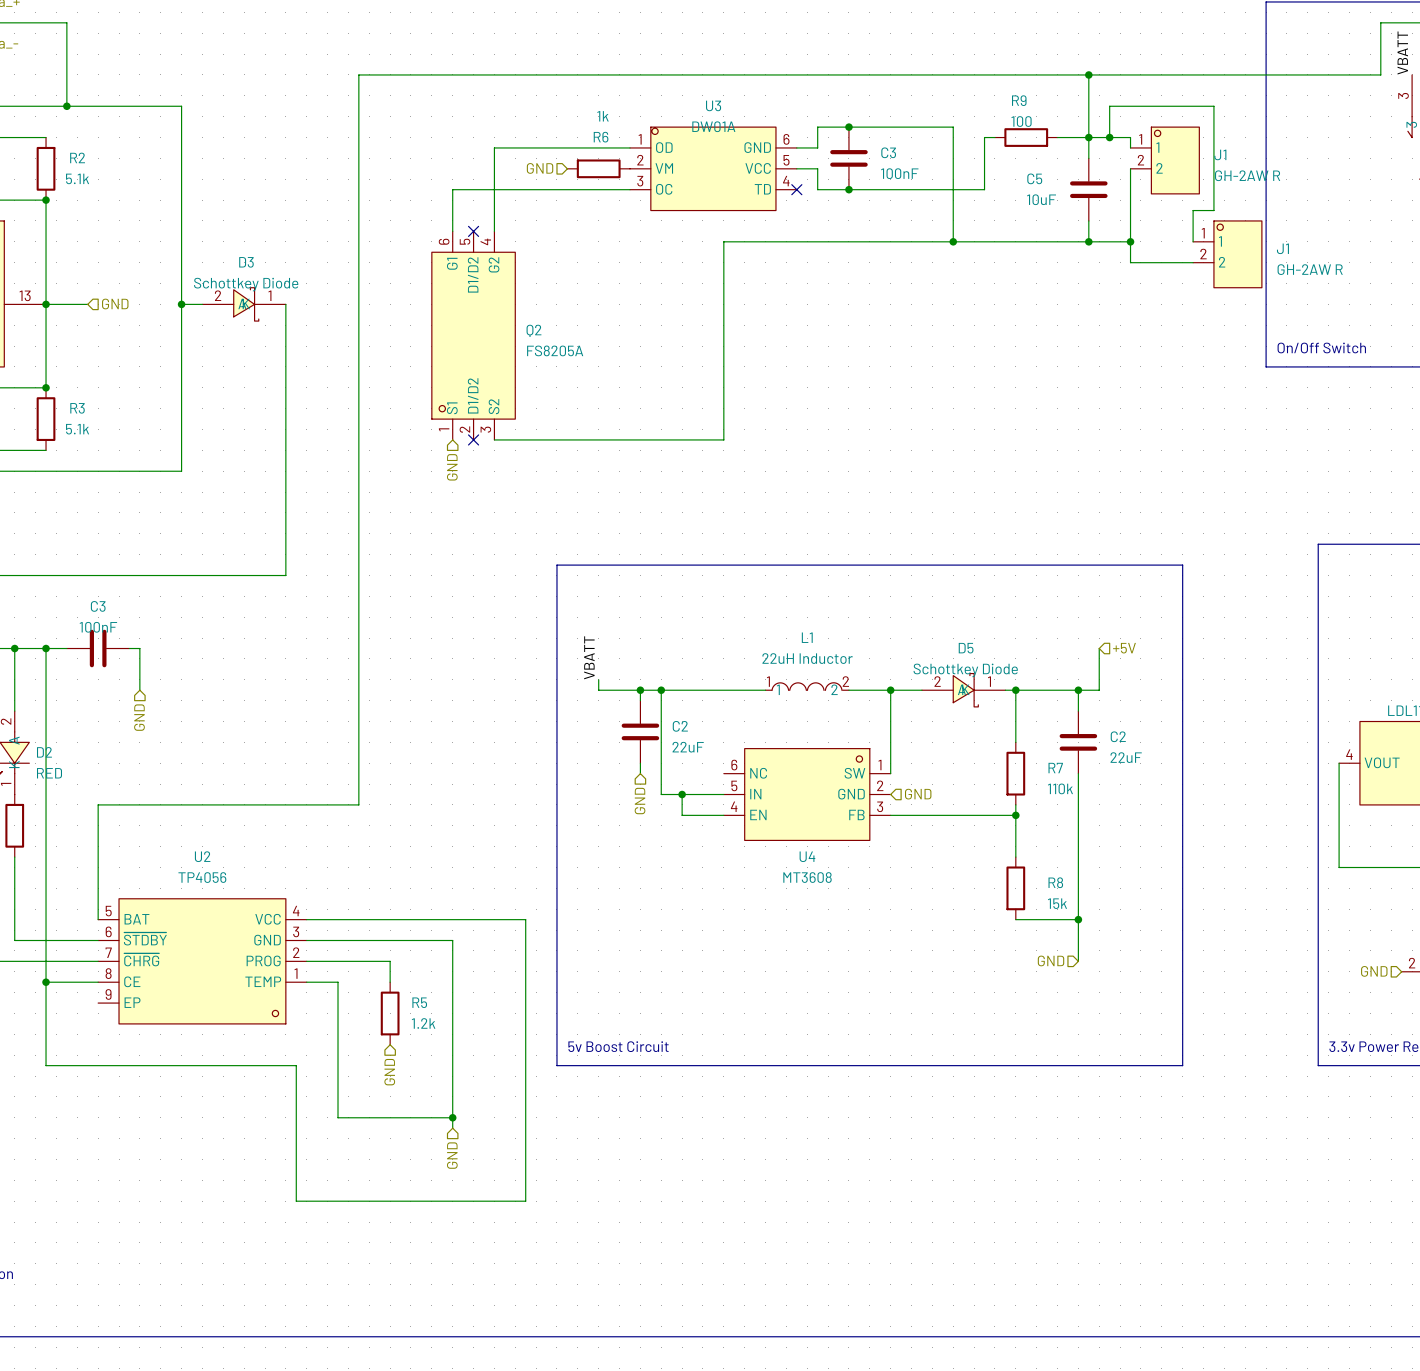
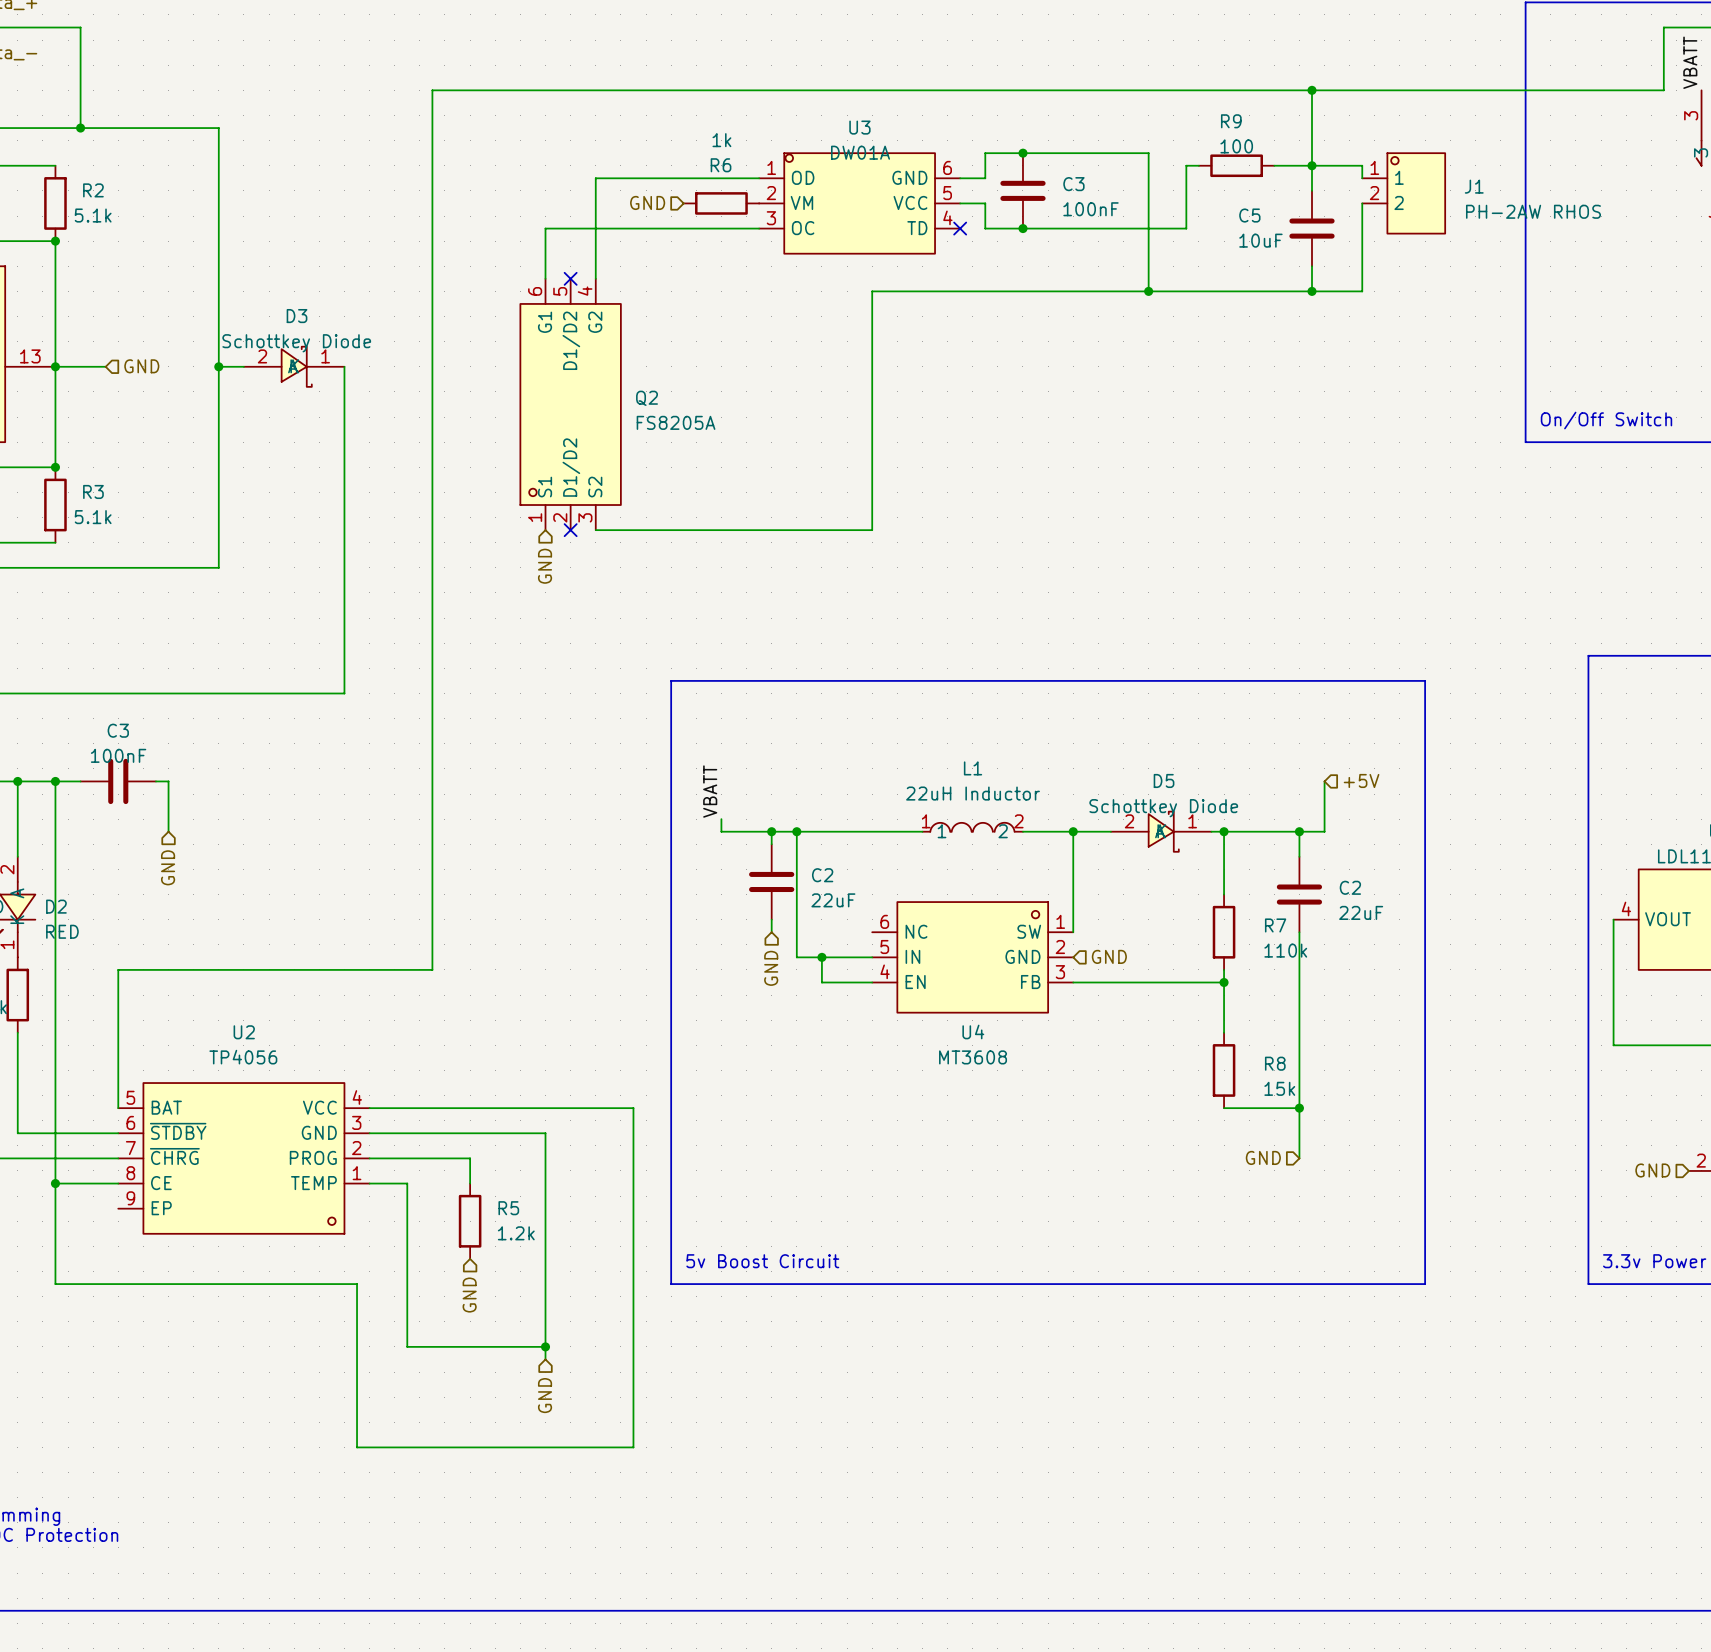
wire: (1109, 137) (1109, 106) (1213, 106) (1213, 210) (1193, 210) (1193, 241) -> none
junction: (1109, 137) -> none
J1 value: GH-2AW R (1247, 175) -> PH-2AW RHOS (1533, 211)
wire: (1130, 241) (1130, 262) (1193, 262) -> none
junction: (1130, 241) -> none
J1: GH-2AW R (1227, 254) -> none

